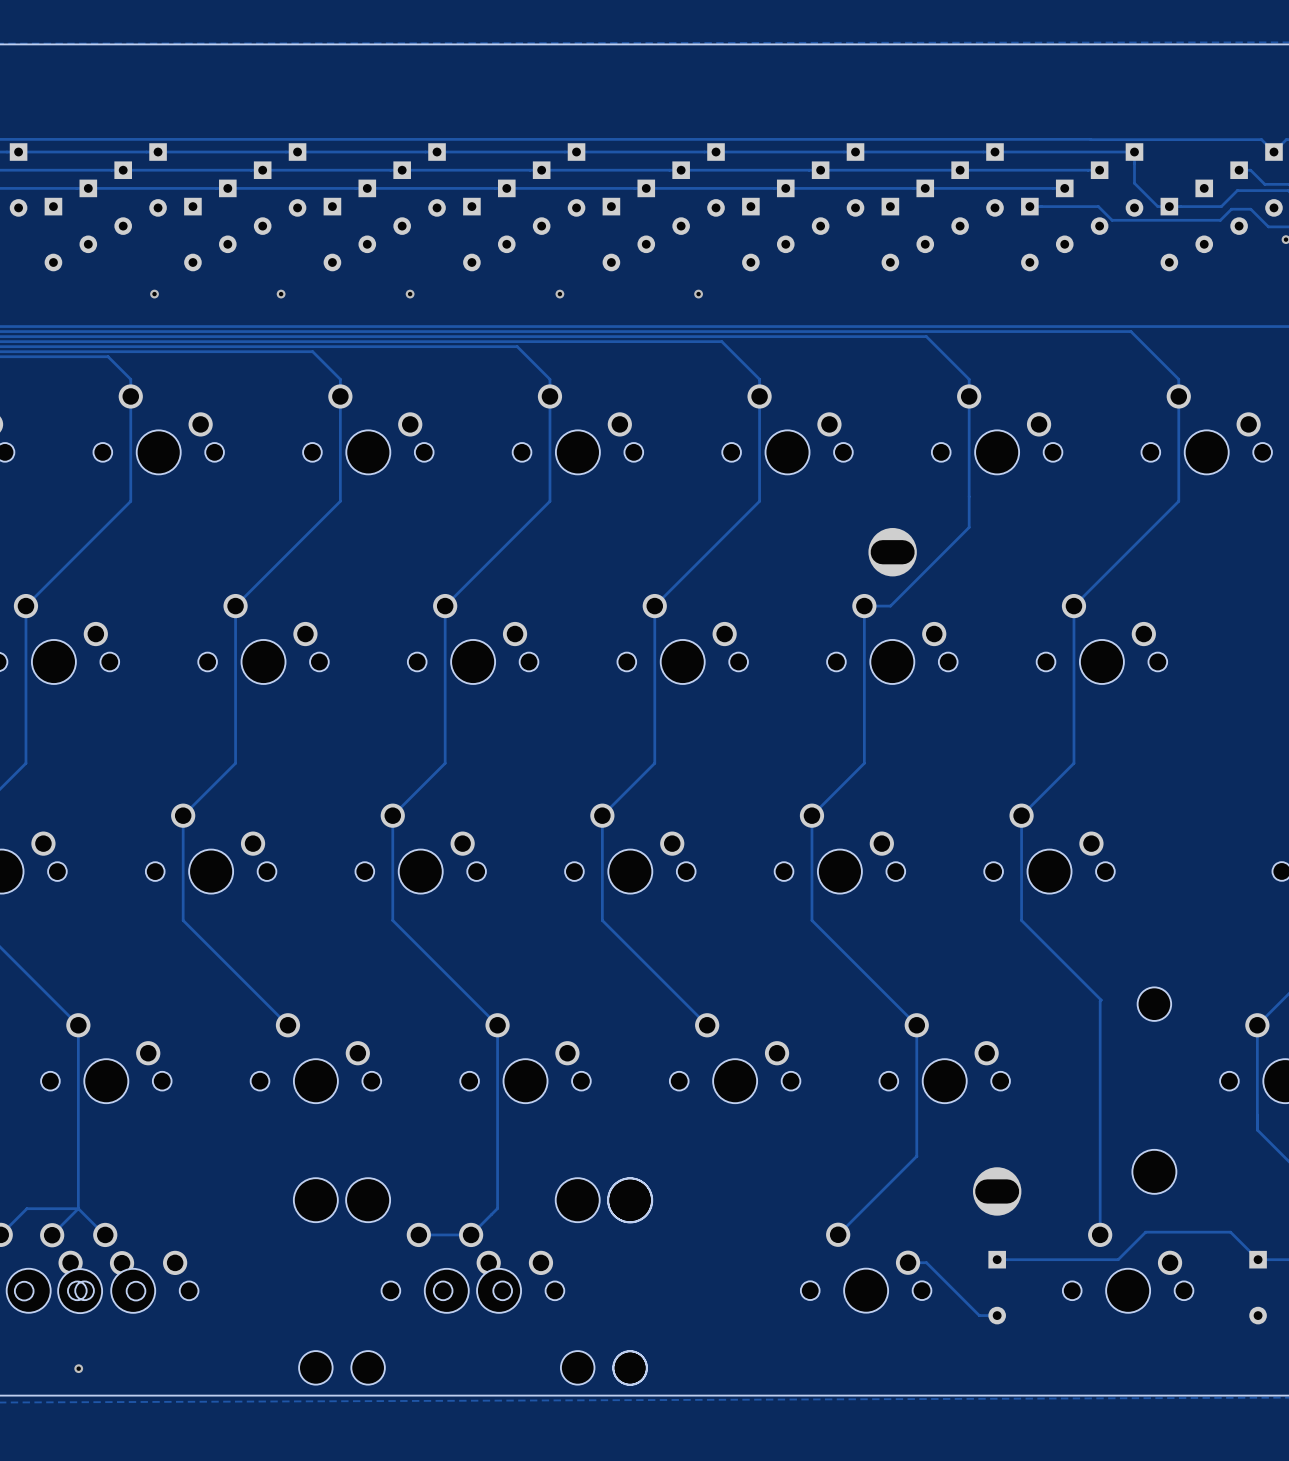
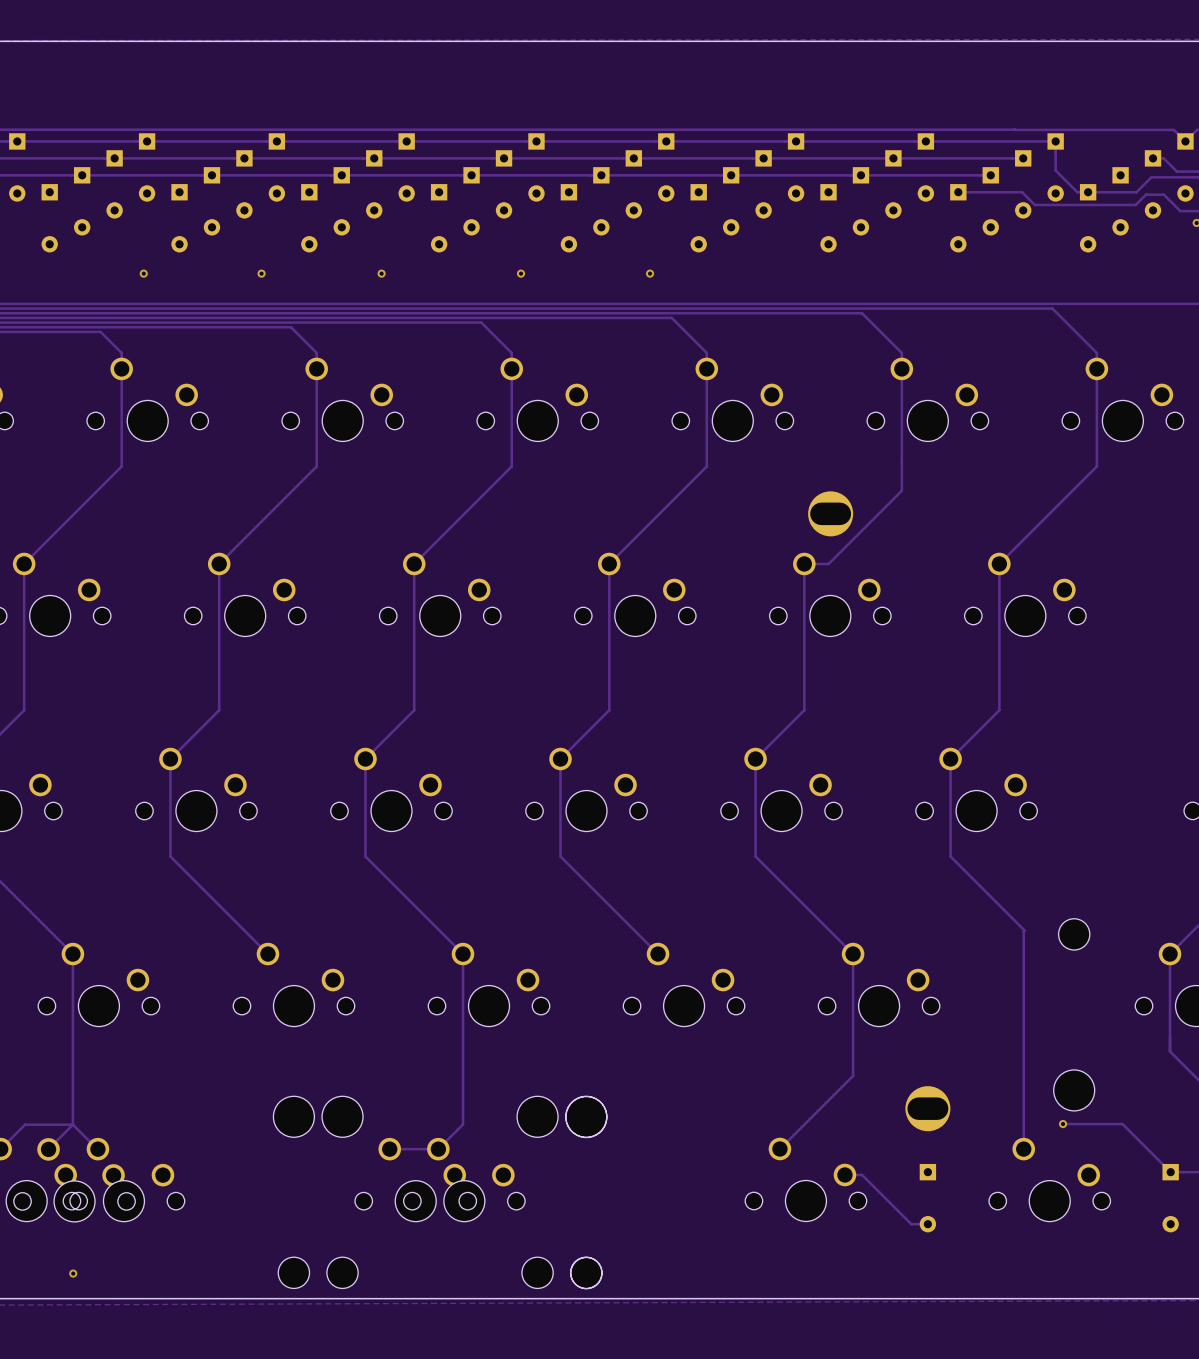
via: none -> (1063, 1124)
track: (1230, 1232) (1145, 1232) (1118, 1259) (997, 1259) -> (1145, 1146) (1122, 1124) (1063, 1124)

